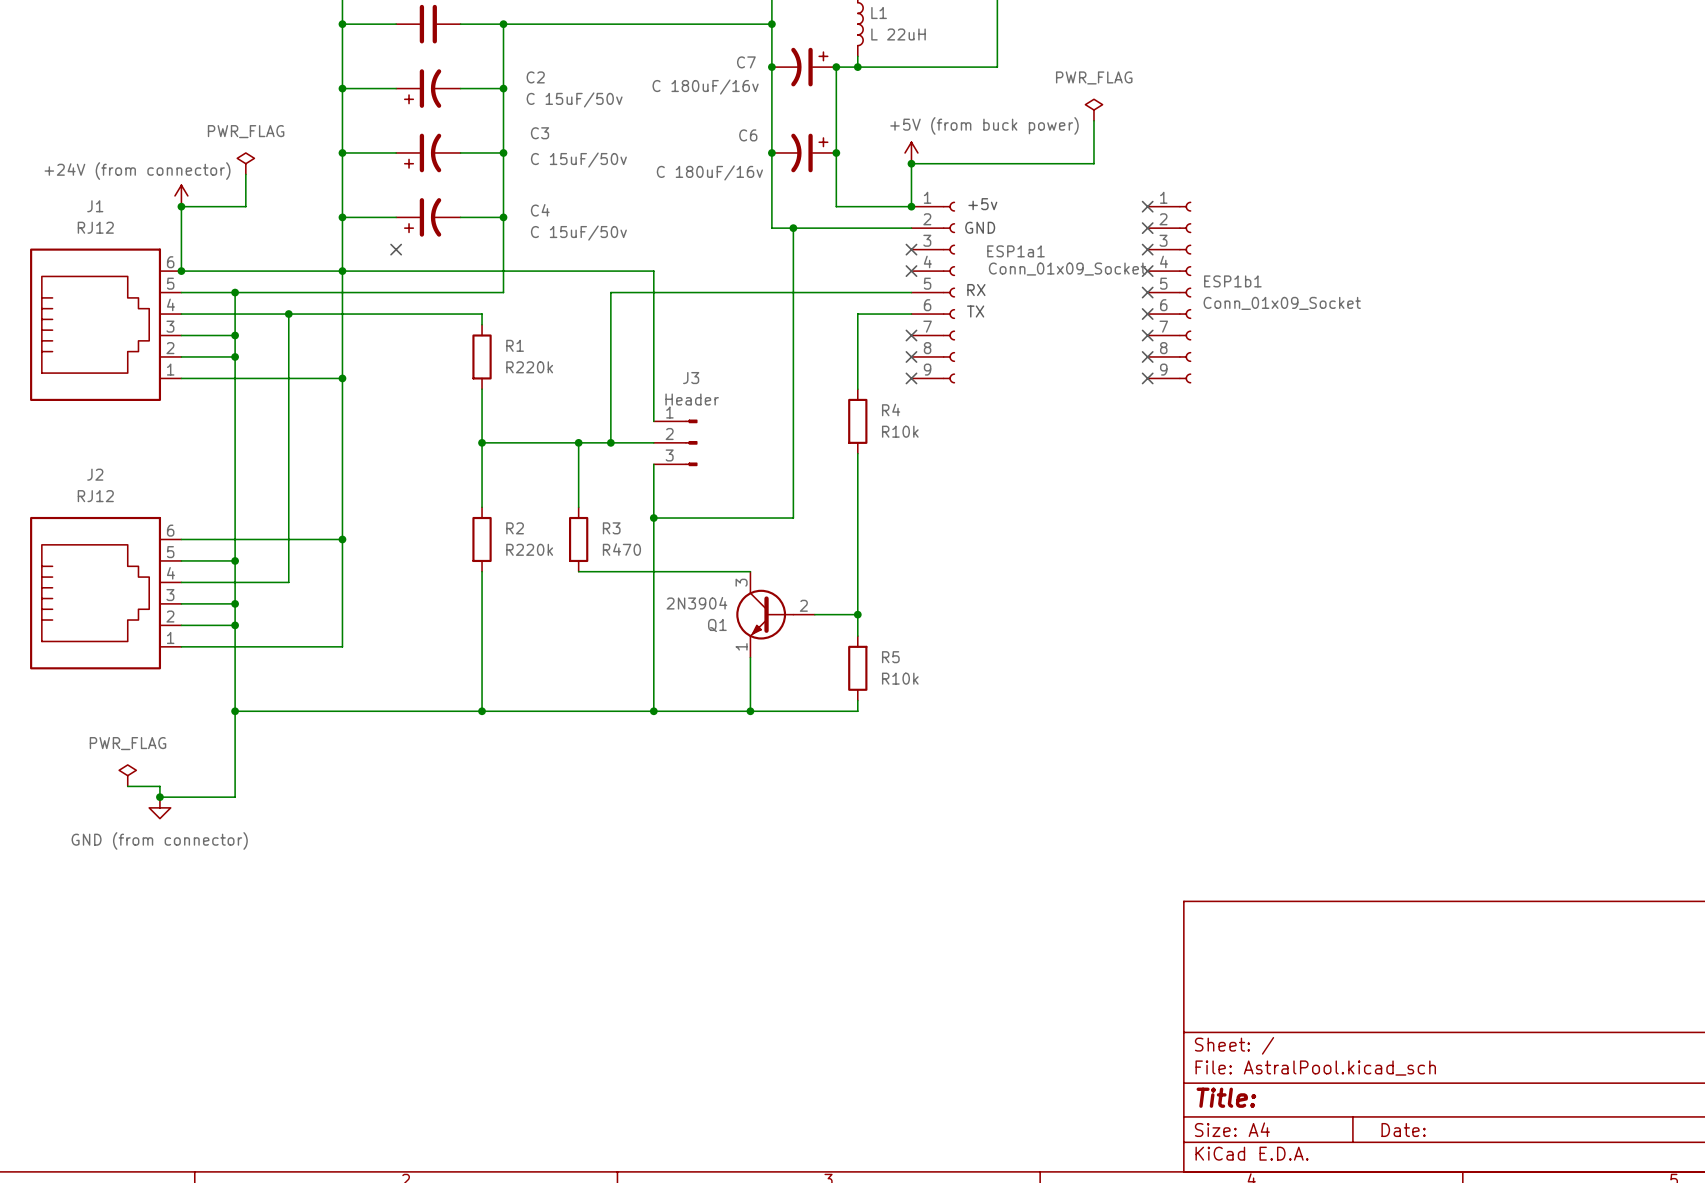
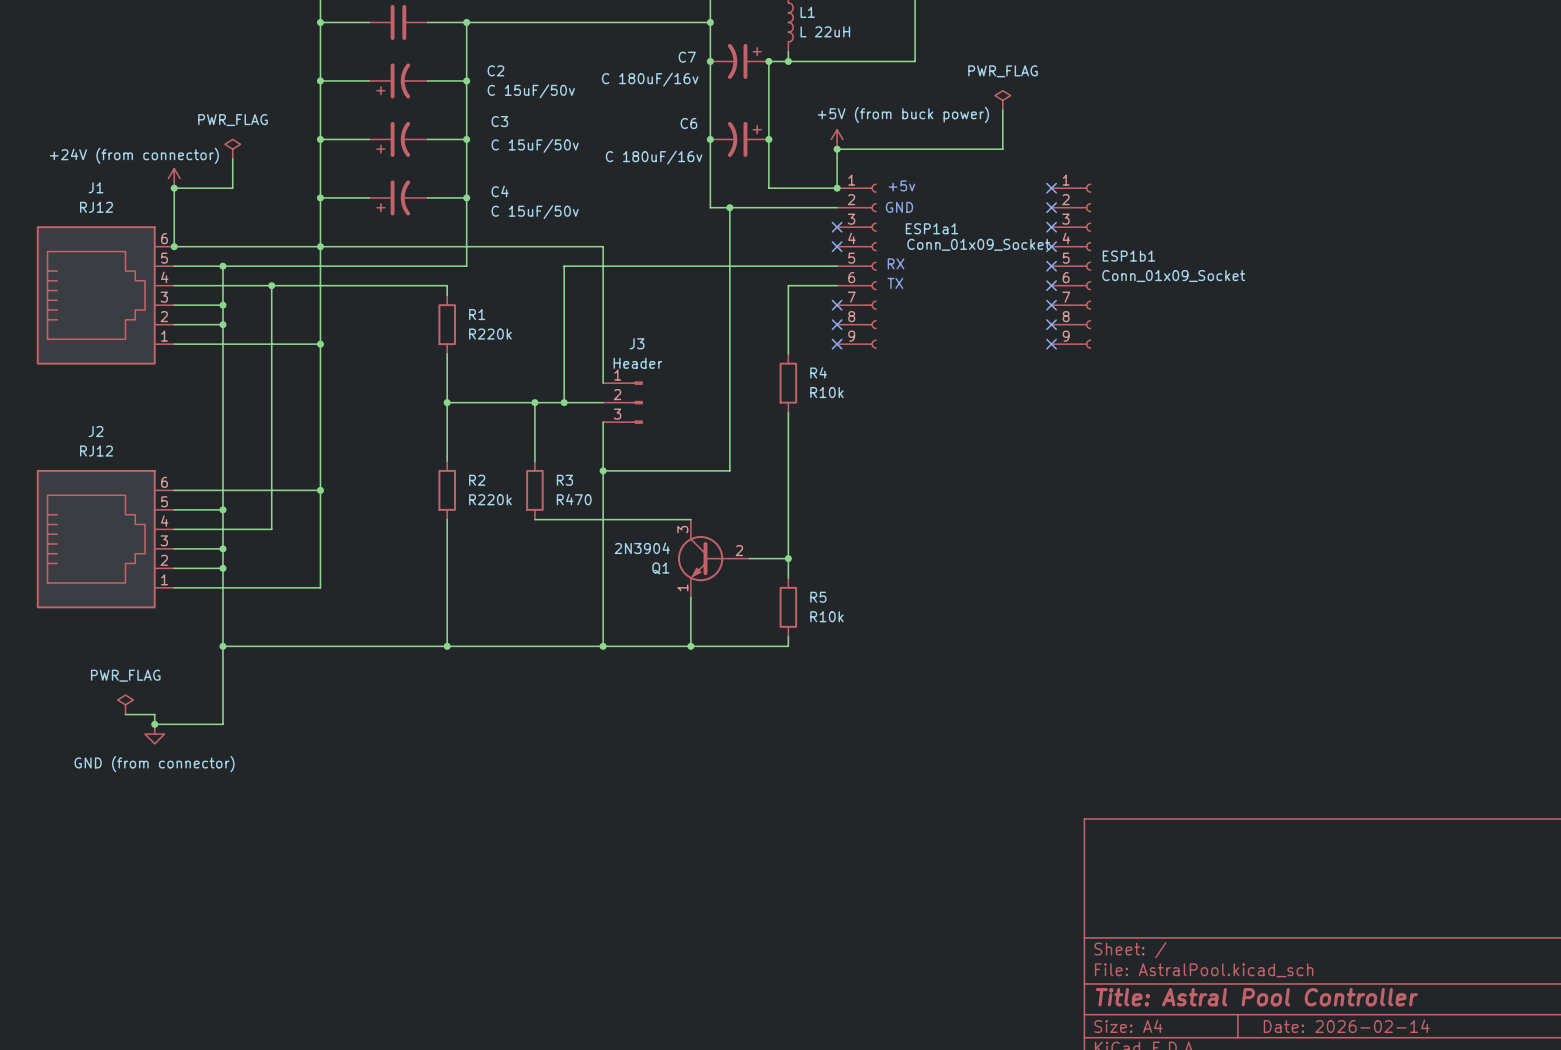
no-connect mark: (396, 249) -> none
title block: Title: (1226, 1097) -> Title: Astral Pool Controller (1256, 997)
title block: Date: (1403, 1130) -> Date: 2026-02-14 (1346, 1026)

